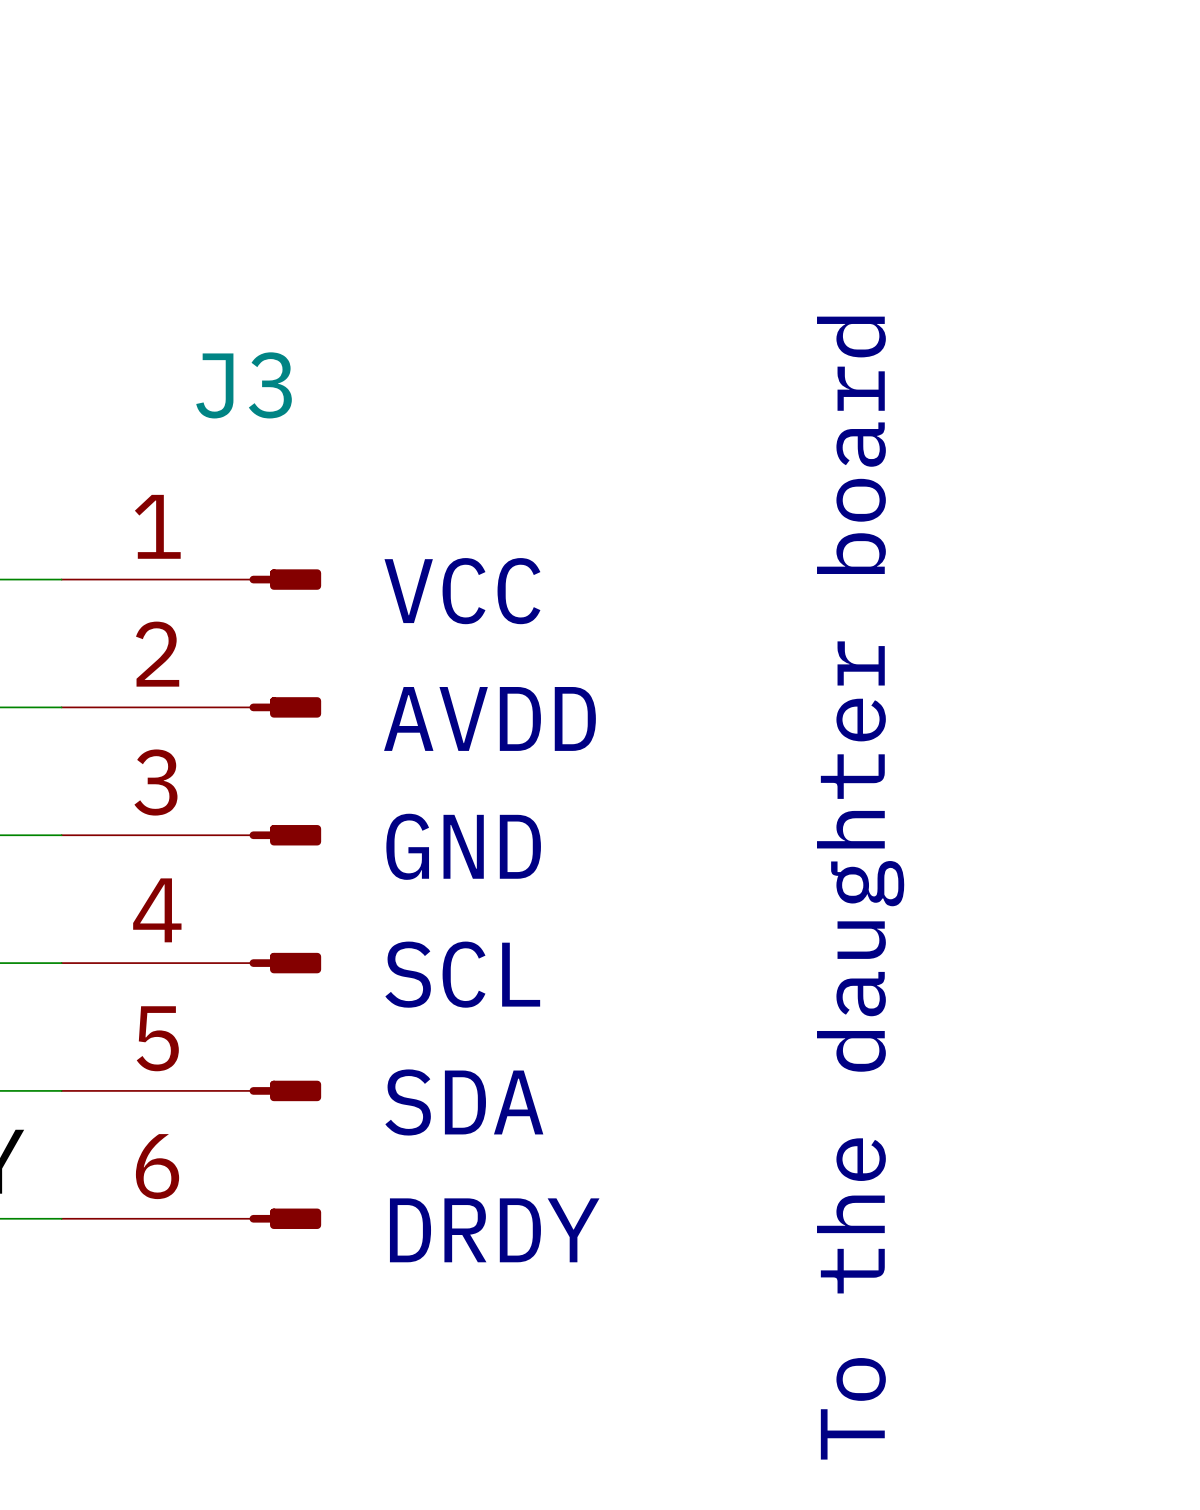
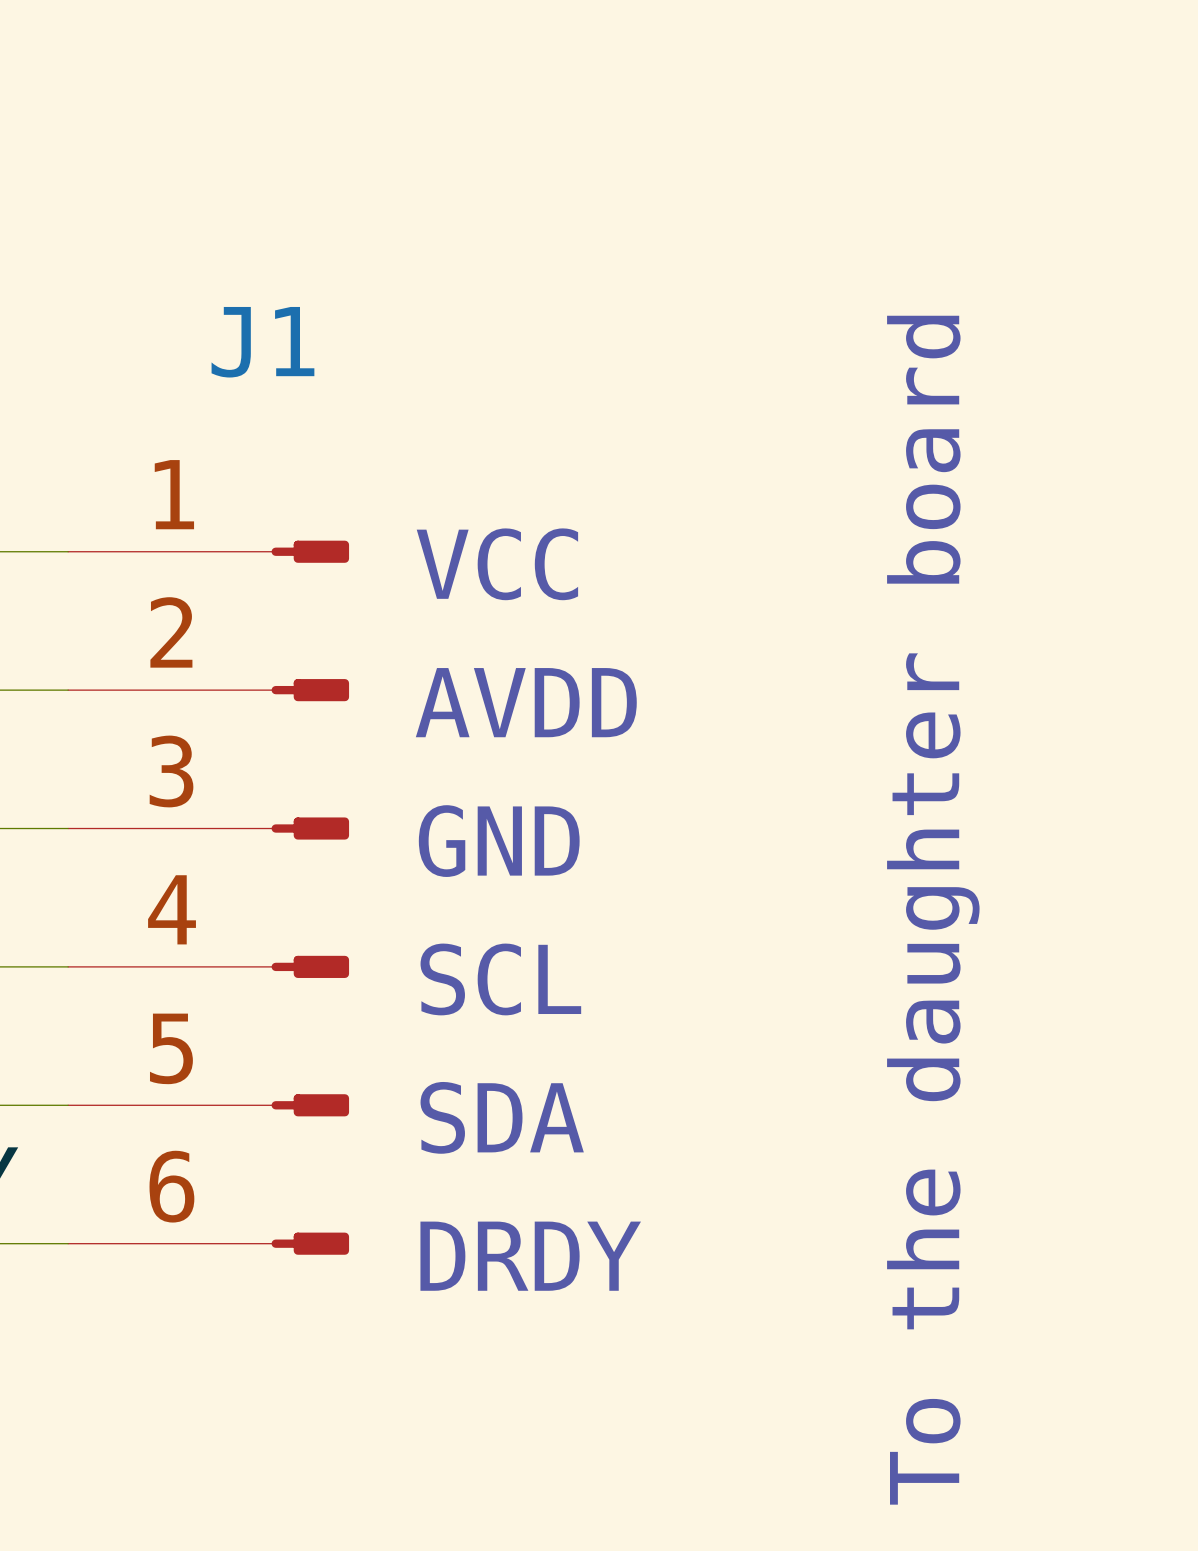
J3 name: J3 (244, 385) -> J1 (262, 342)

